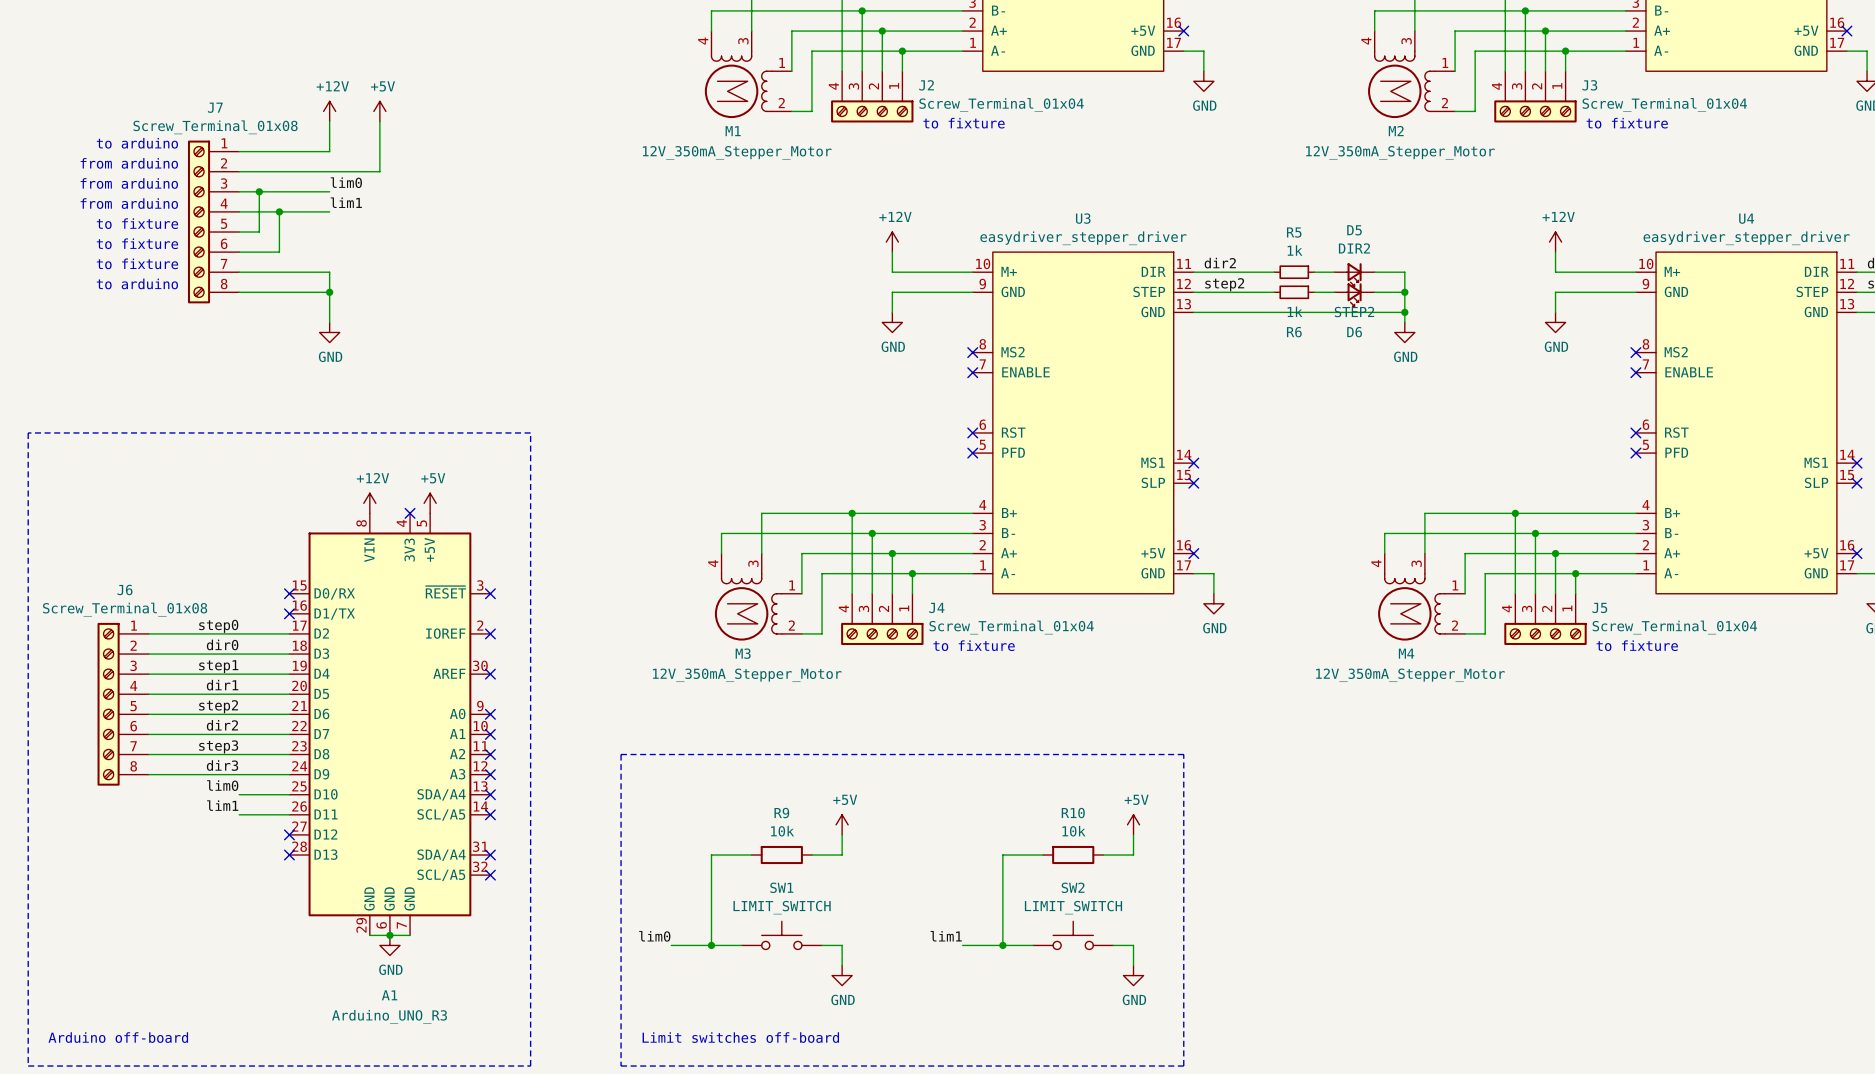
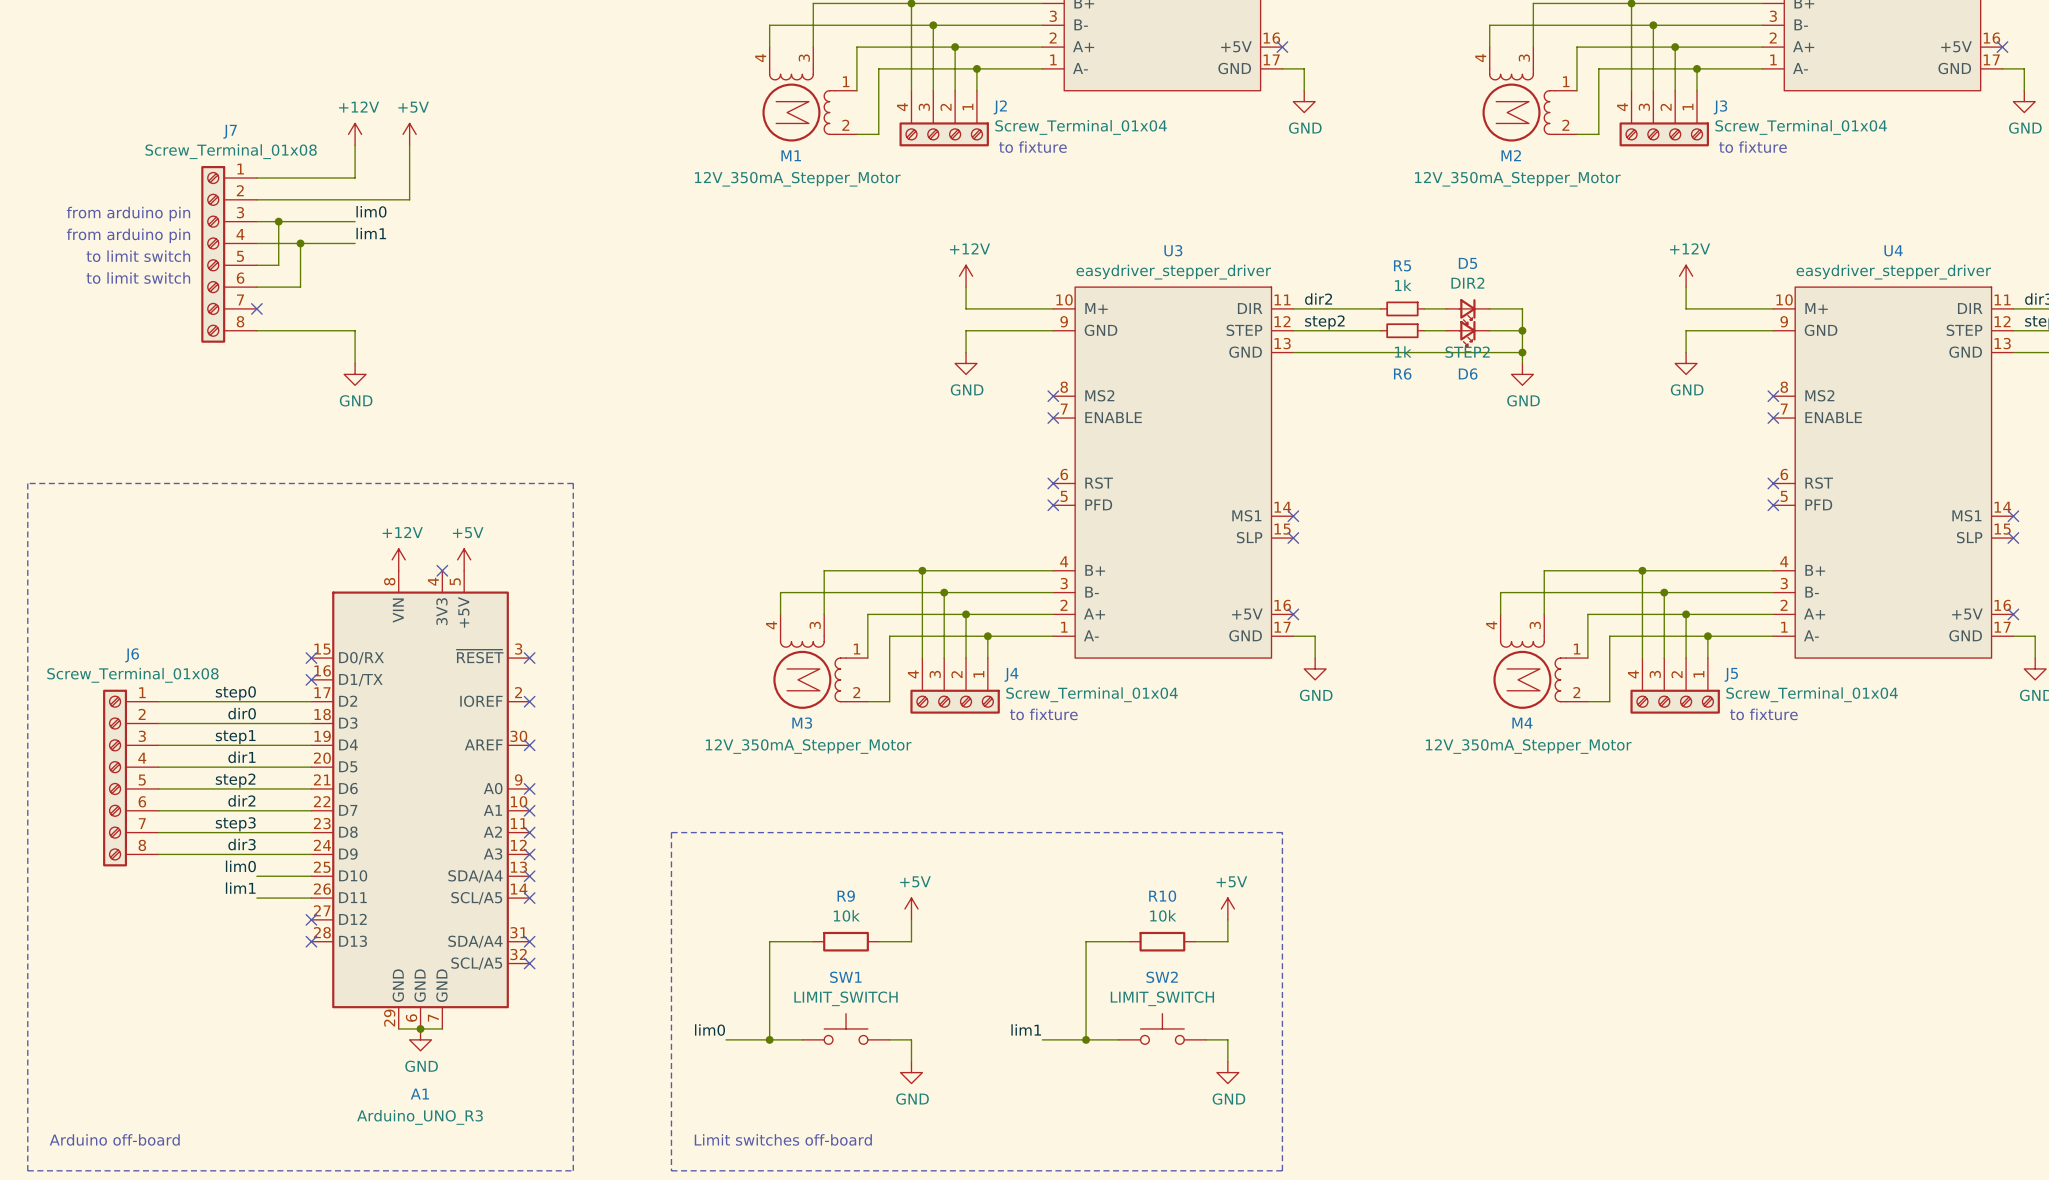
text: to arduino (137, 143) -> none
text: from arduino (129, 163) -> none
text: from arduino (129, 183) -> from arduino pin (128, 214)
text: from arduino (129, 203) -> from arduino pin (128, 235)
text: to fixture (137, 223) -> to limit switch (138, 256)
text: to fixture (137, 243) -> to limit switch (138, 278)
text: to fixture (137, 263) -> none
wire: (239, 272) (329, 272) (329, 292) -> none
no-connect mark: none -> (256, 308)
text: to arduino (137, 283) -> none
junction: (329, 292) -> none

